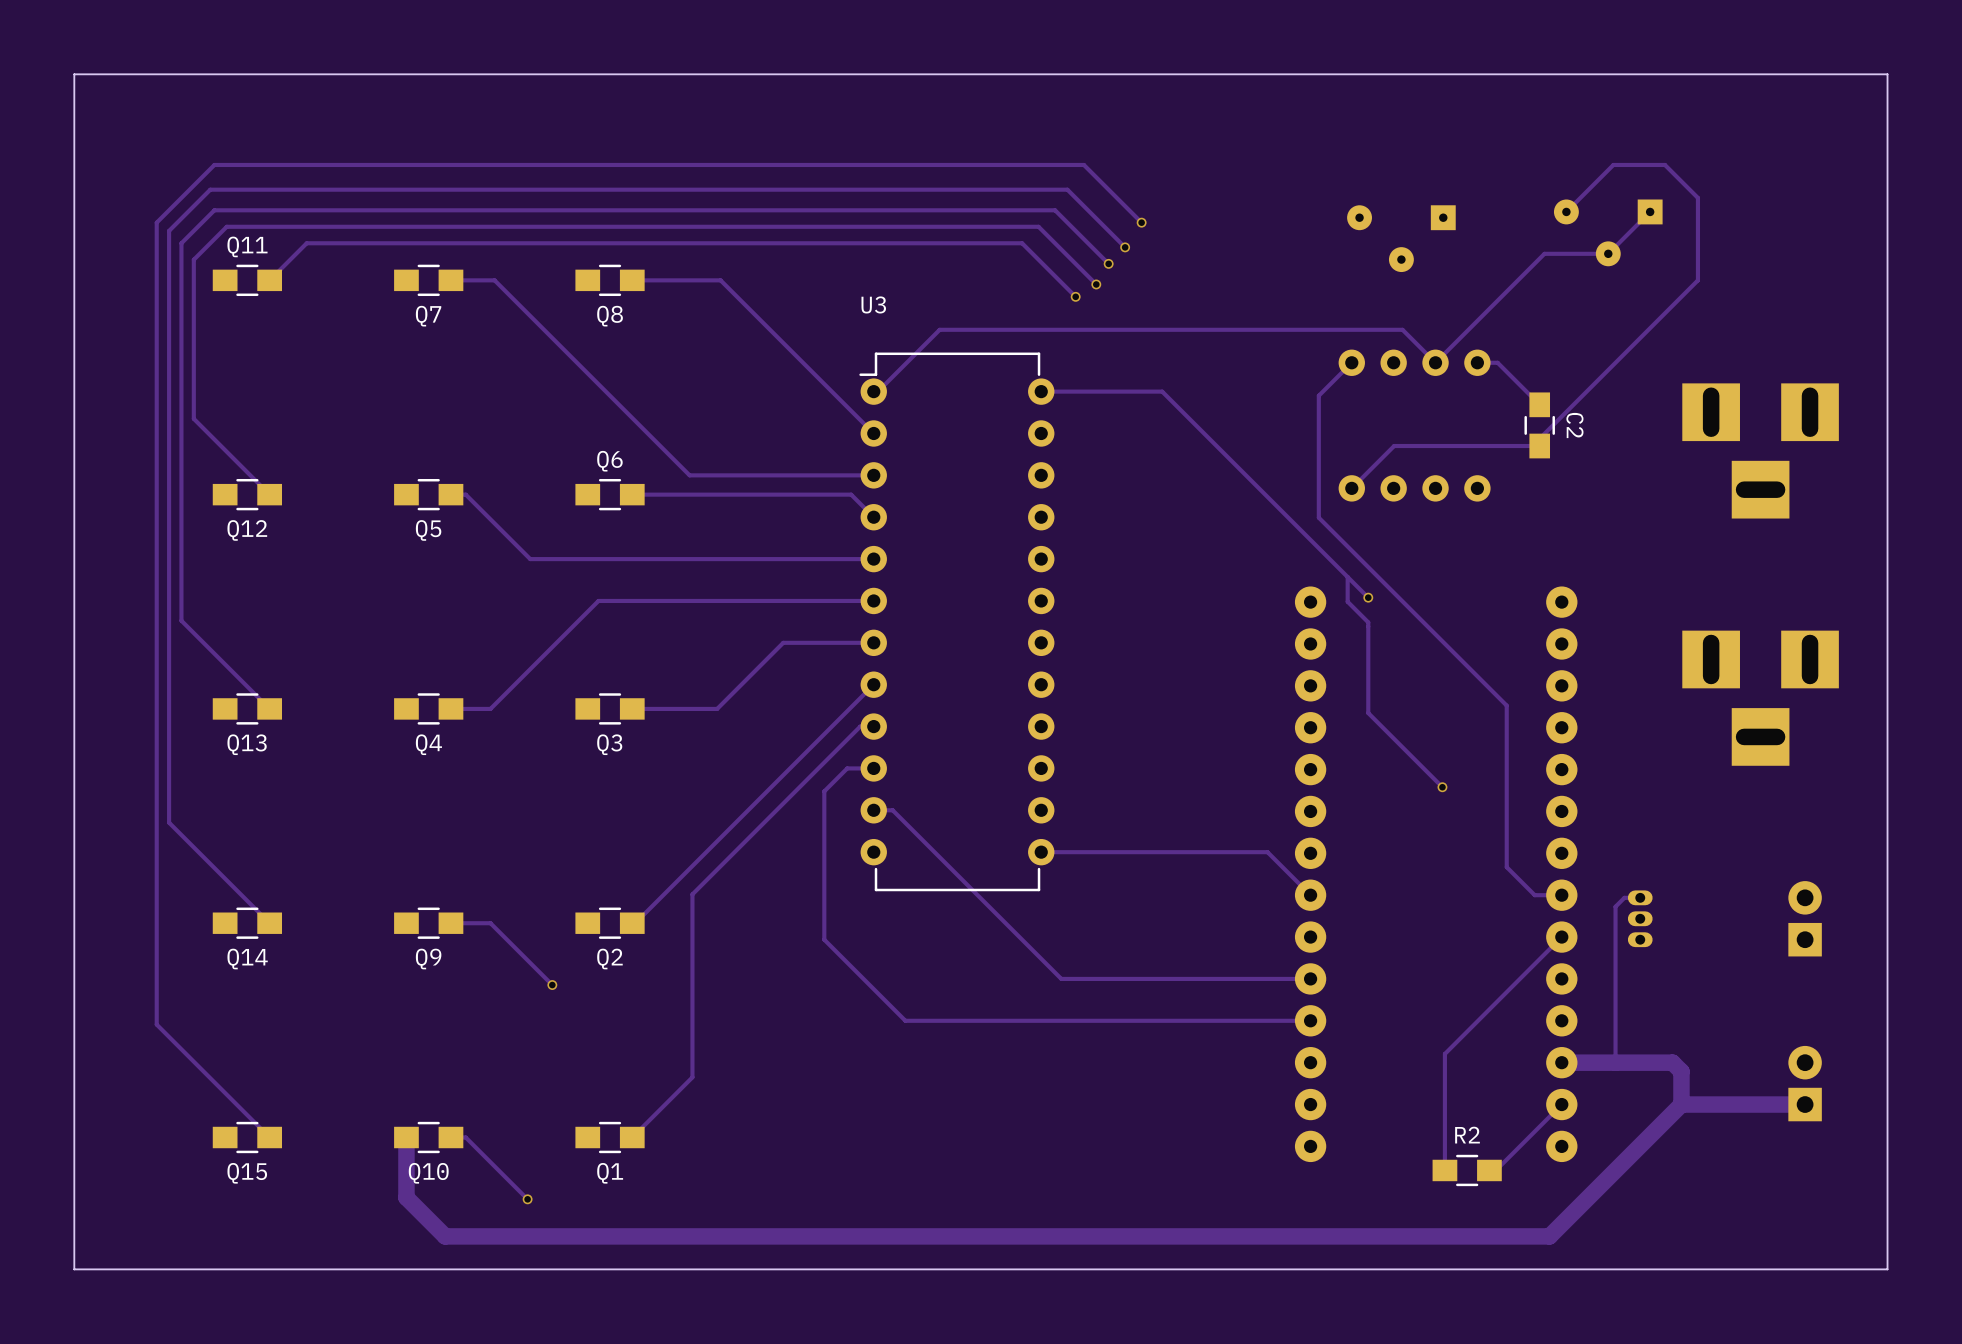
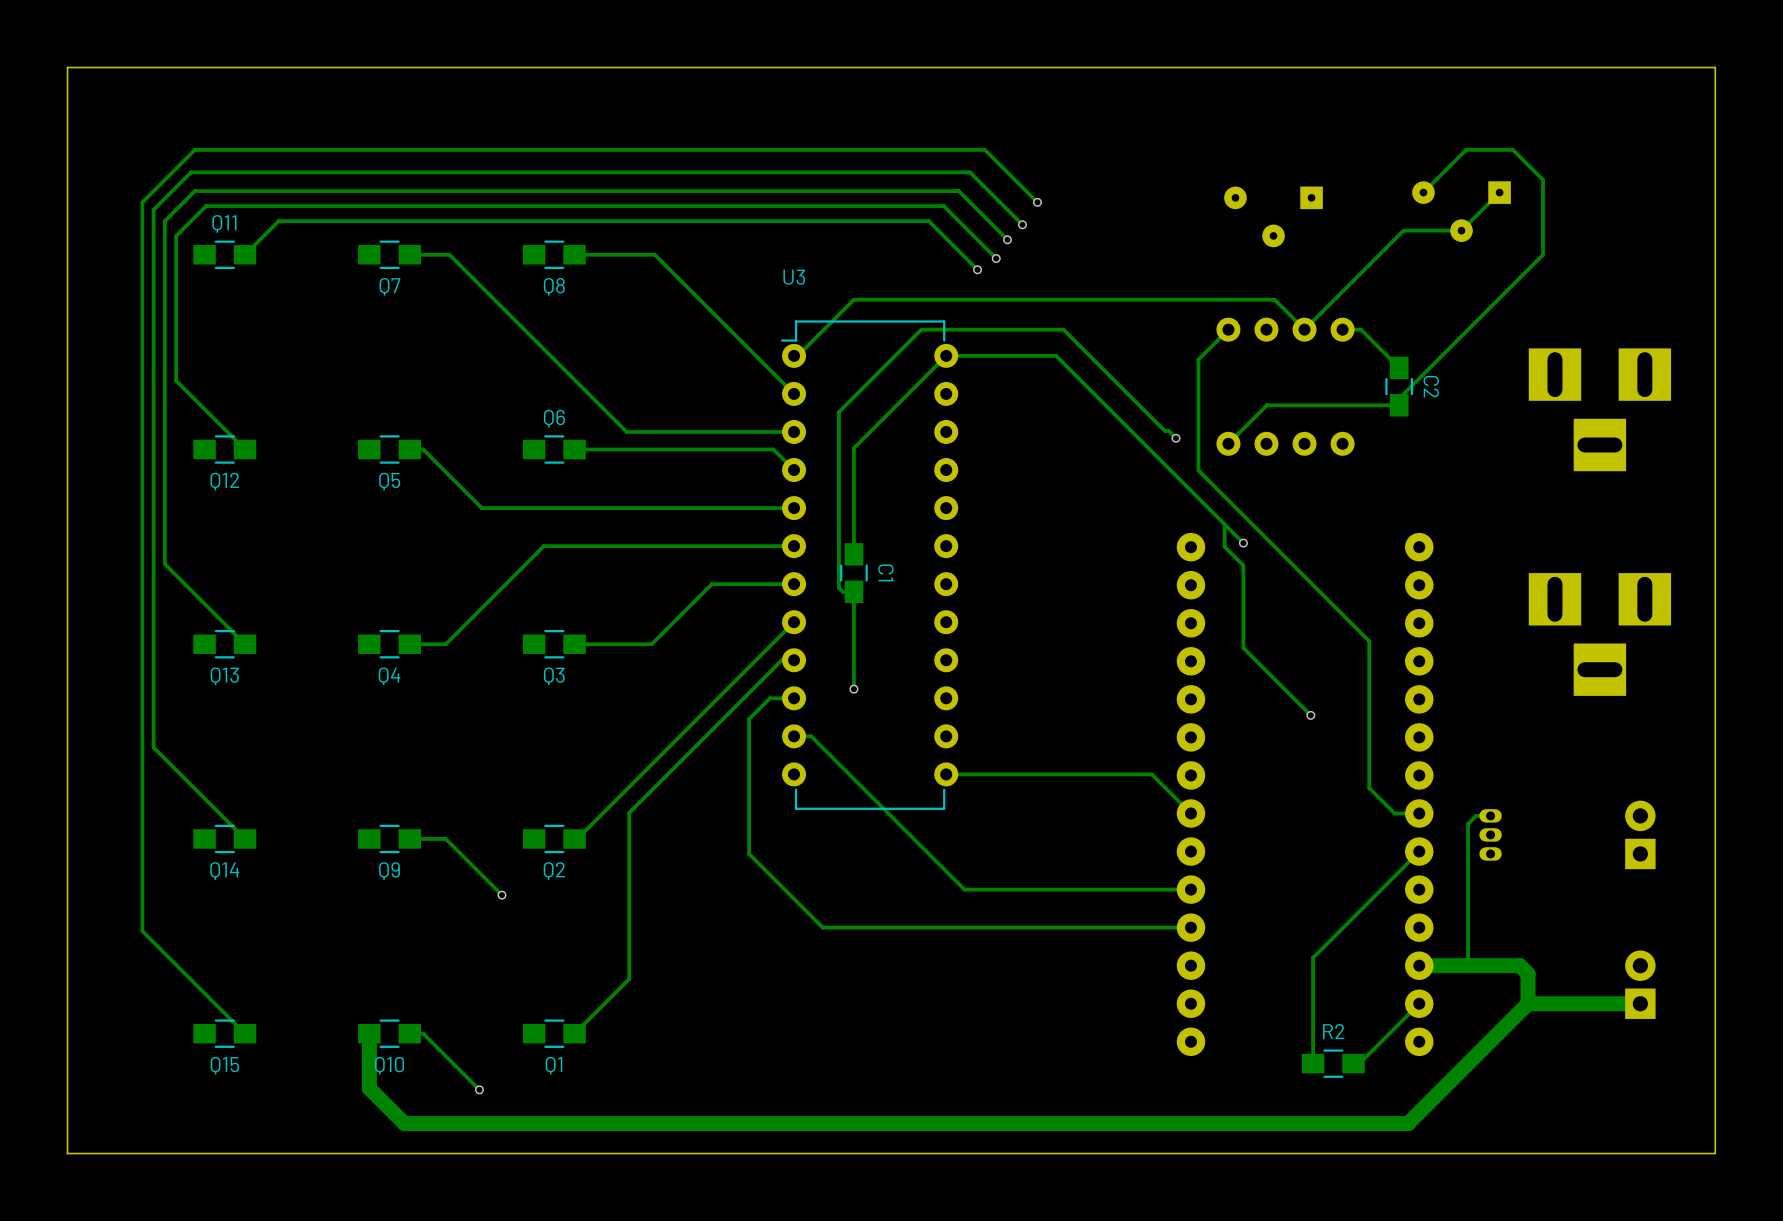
track: none -> (946, 355) (853, 448) (853, 554)
track: none -> (1176, 438) (1168, 430) (1164, 430) (1063, 329) (921, 329) (838, 412) (838, 588) (842, 591) (853, 591) (853, 689)
via: none -> (1176, 438)
C1: none -> (853, 573)
via: none -> (853, 689)

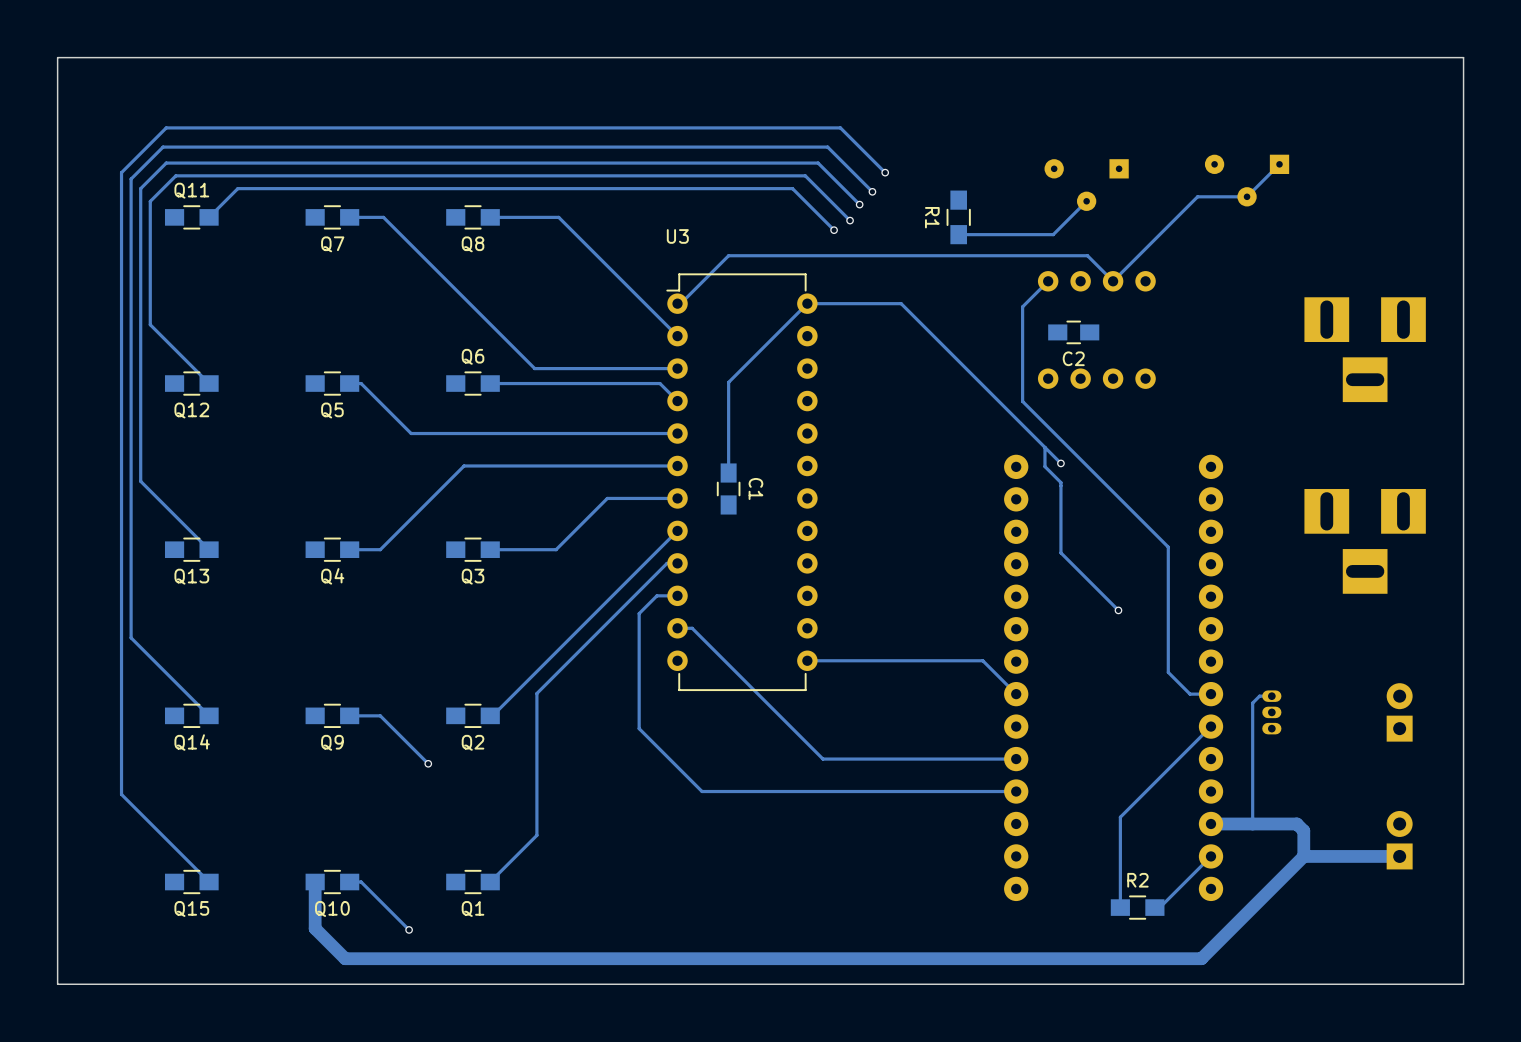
track: (1423, 192) (1466, 149) (1513, 149) (1543, 179) (1543, 254) (1399, 398) (1399, 405) (1266, 405) (1228, 443) -> none
track: none -> (1086, 201) (1053, 234) (958, 234)
R1: none -> (958, 217)
track: (1342, 329) (1361, 329) (1399, 367) -> none
C2 rotation: 0° (1399, 386) -> 90° clockwise (1073, 332)
C2 position: (1399, 386) -> (1073, 332)
track: (1176, 438) (1168, 430) (1164, 430) (1063, 329) (921, 329) (838, 412) (838, 588) (842, 591) (853, 591) (853, 689) -> none
via: (1176, 438) -> none
via: (853, 689) -> none

